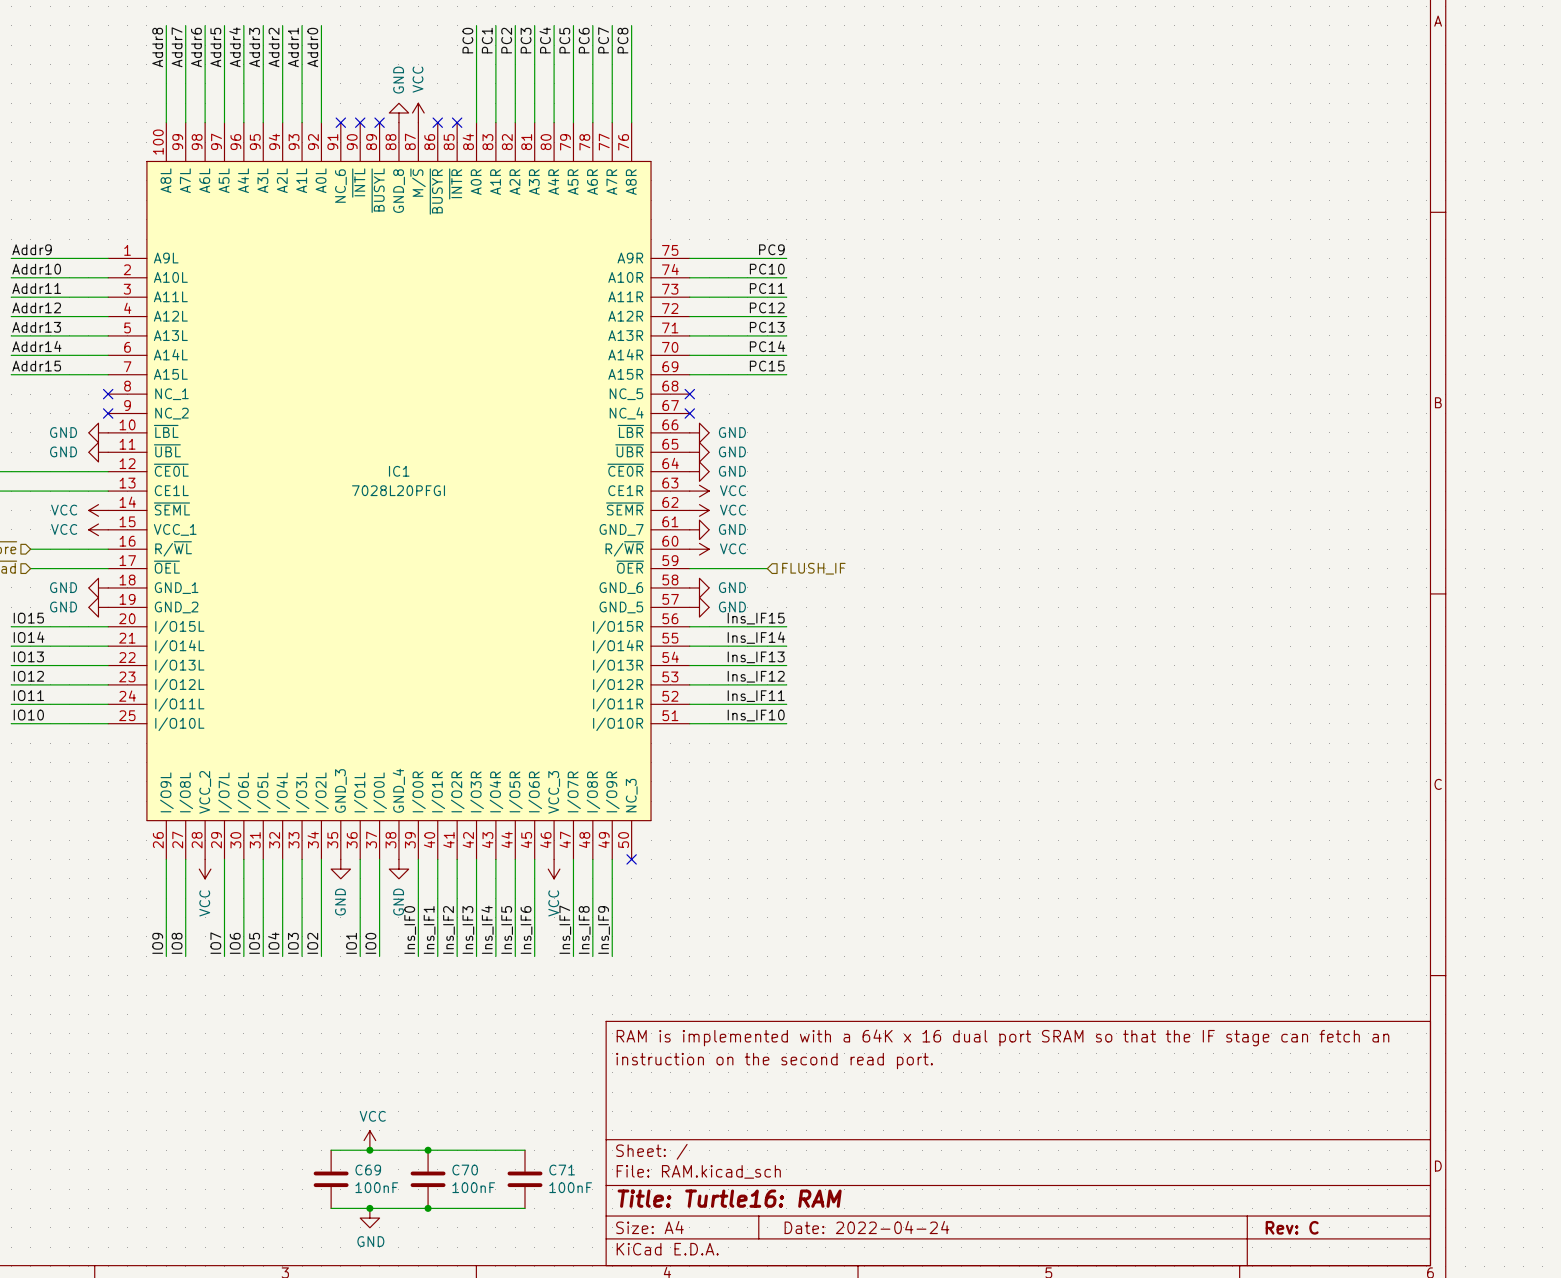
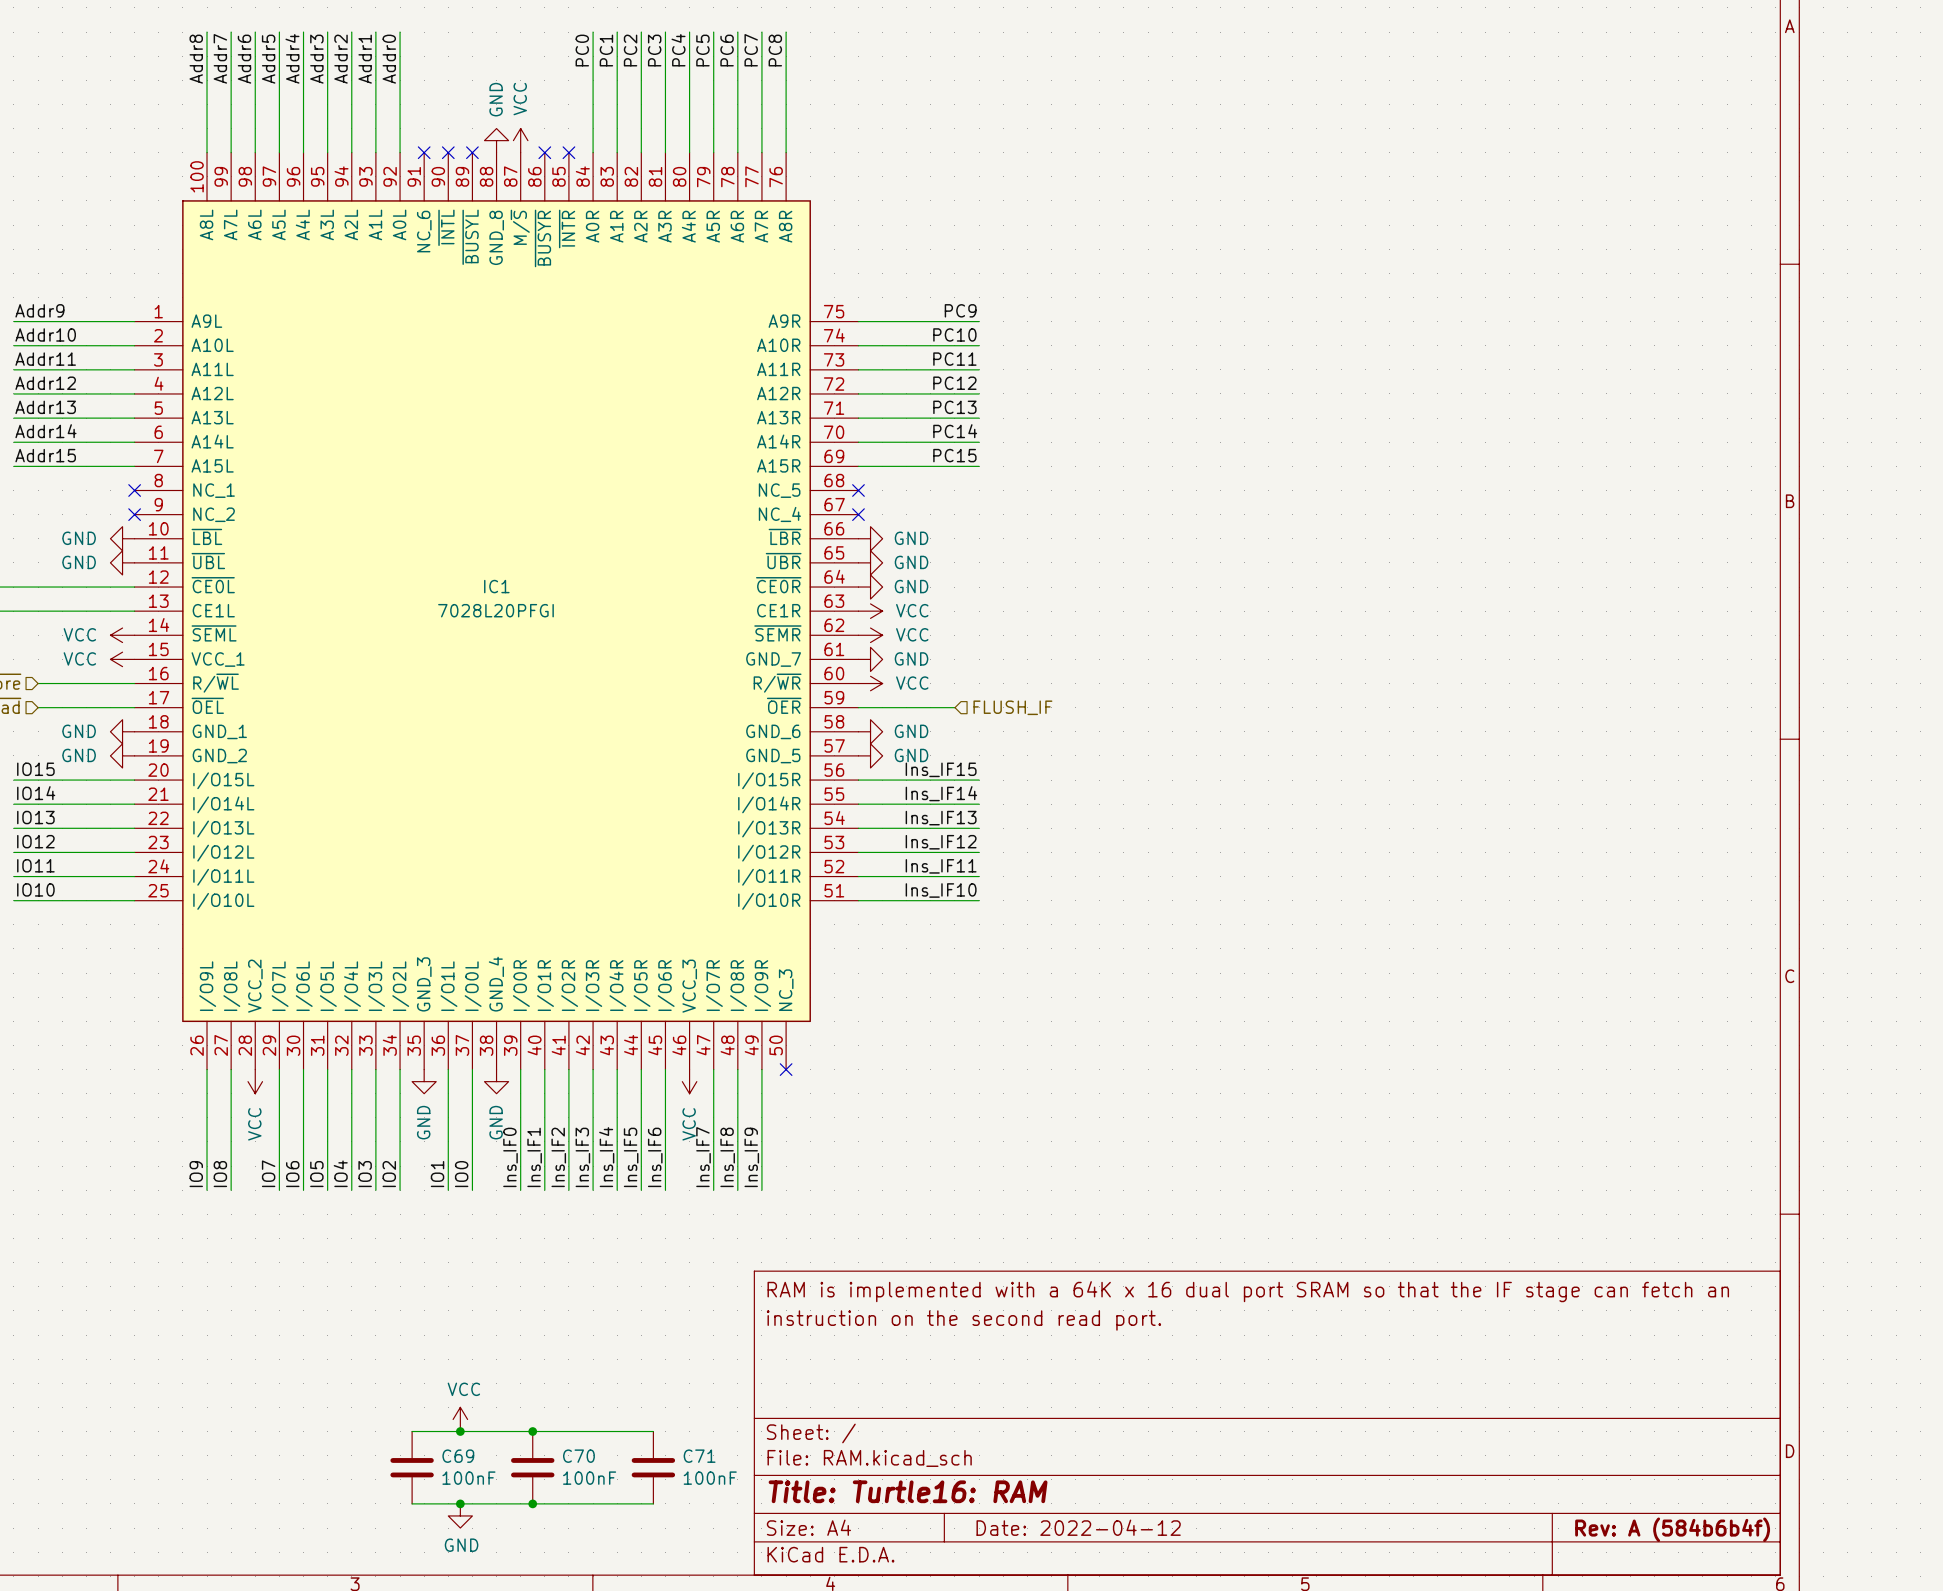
title block: Date: 2022-04-24 (866, 1227) -> Date: 2022-04-12 (1078, 1527)
title block: Rev: C (1292, 1227) -> Rev: A (584b6b4f) (1672, 1529)

